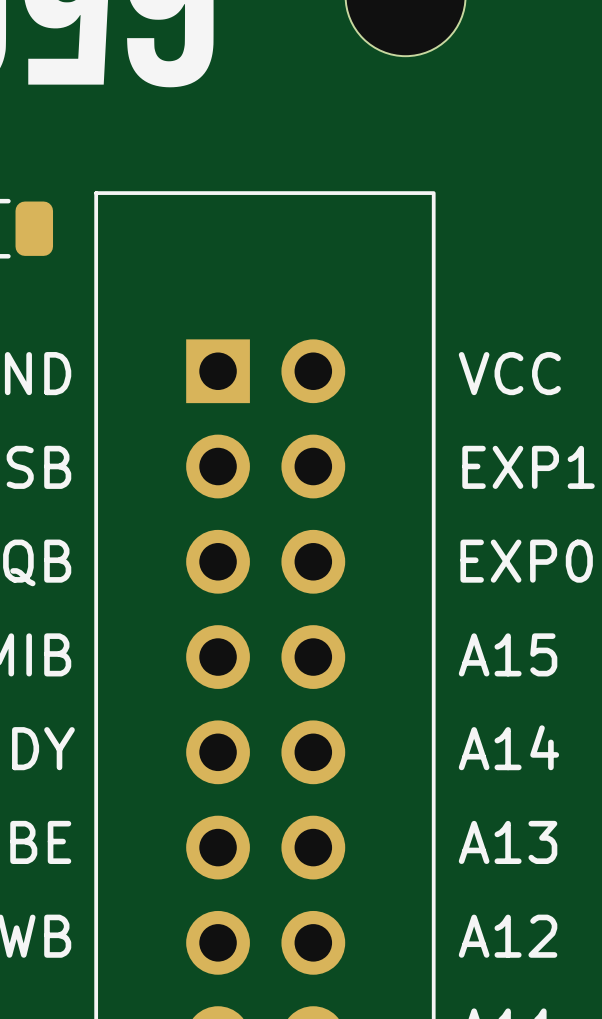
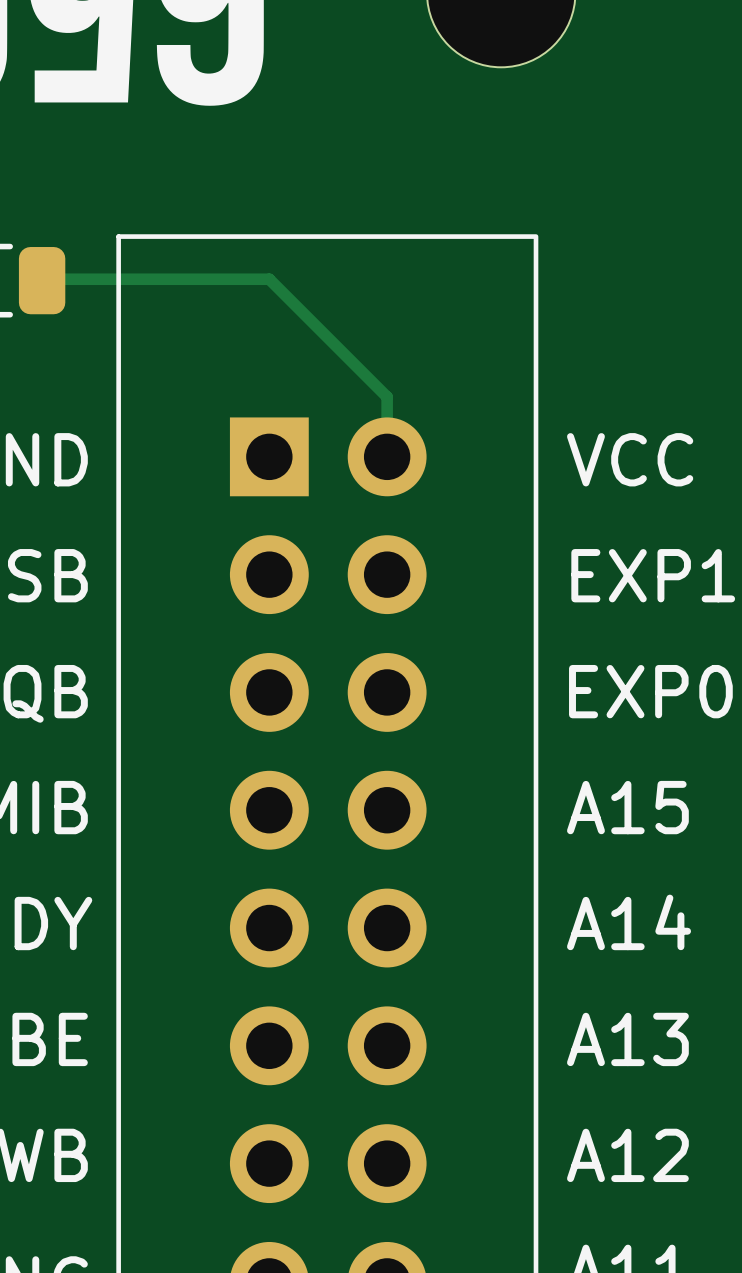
track: none -> (42, 280) (269, 279) (387, 397) (387, 456)

